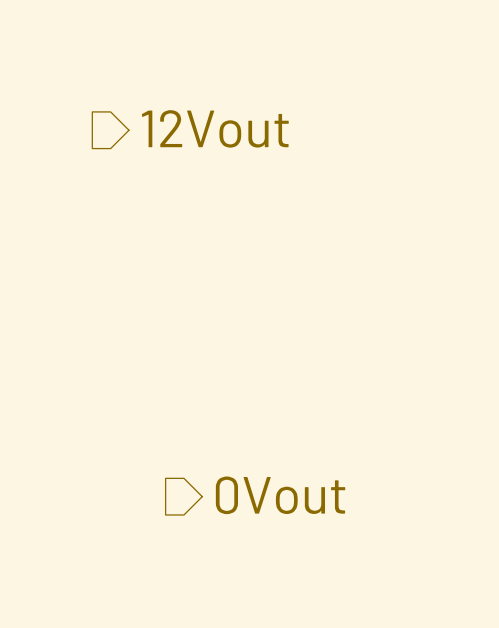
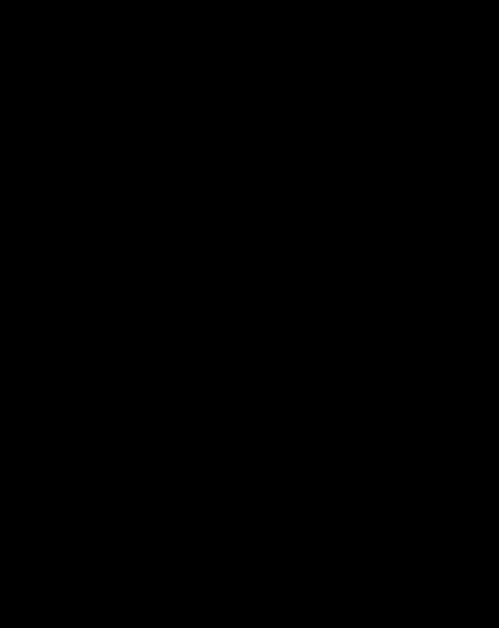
hierarchical label: 12Vout (215, 128) -> none
hierarchical label: 0Vout (280, 495) -> none

